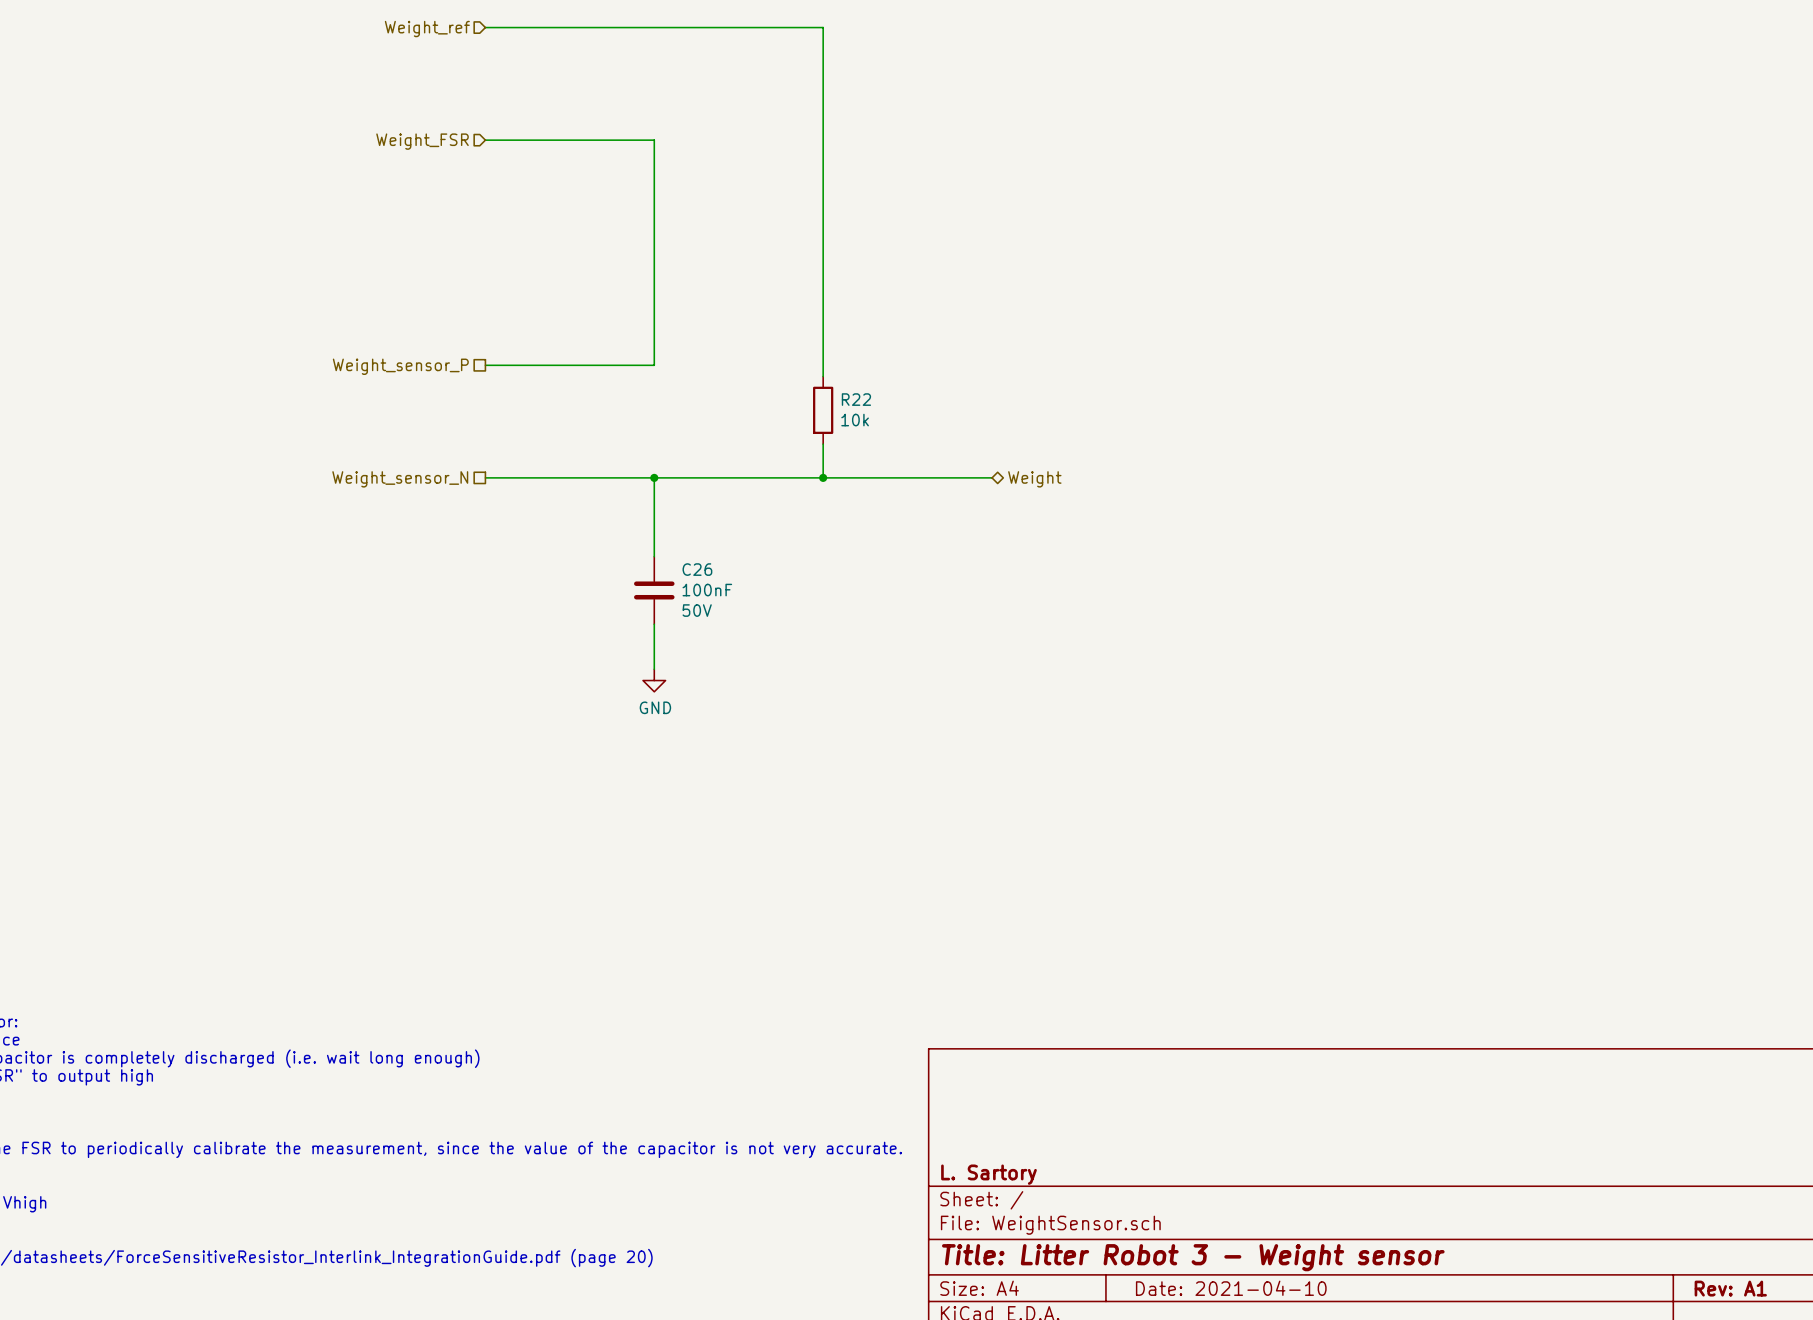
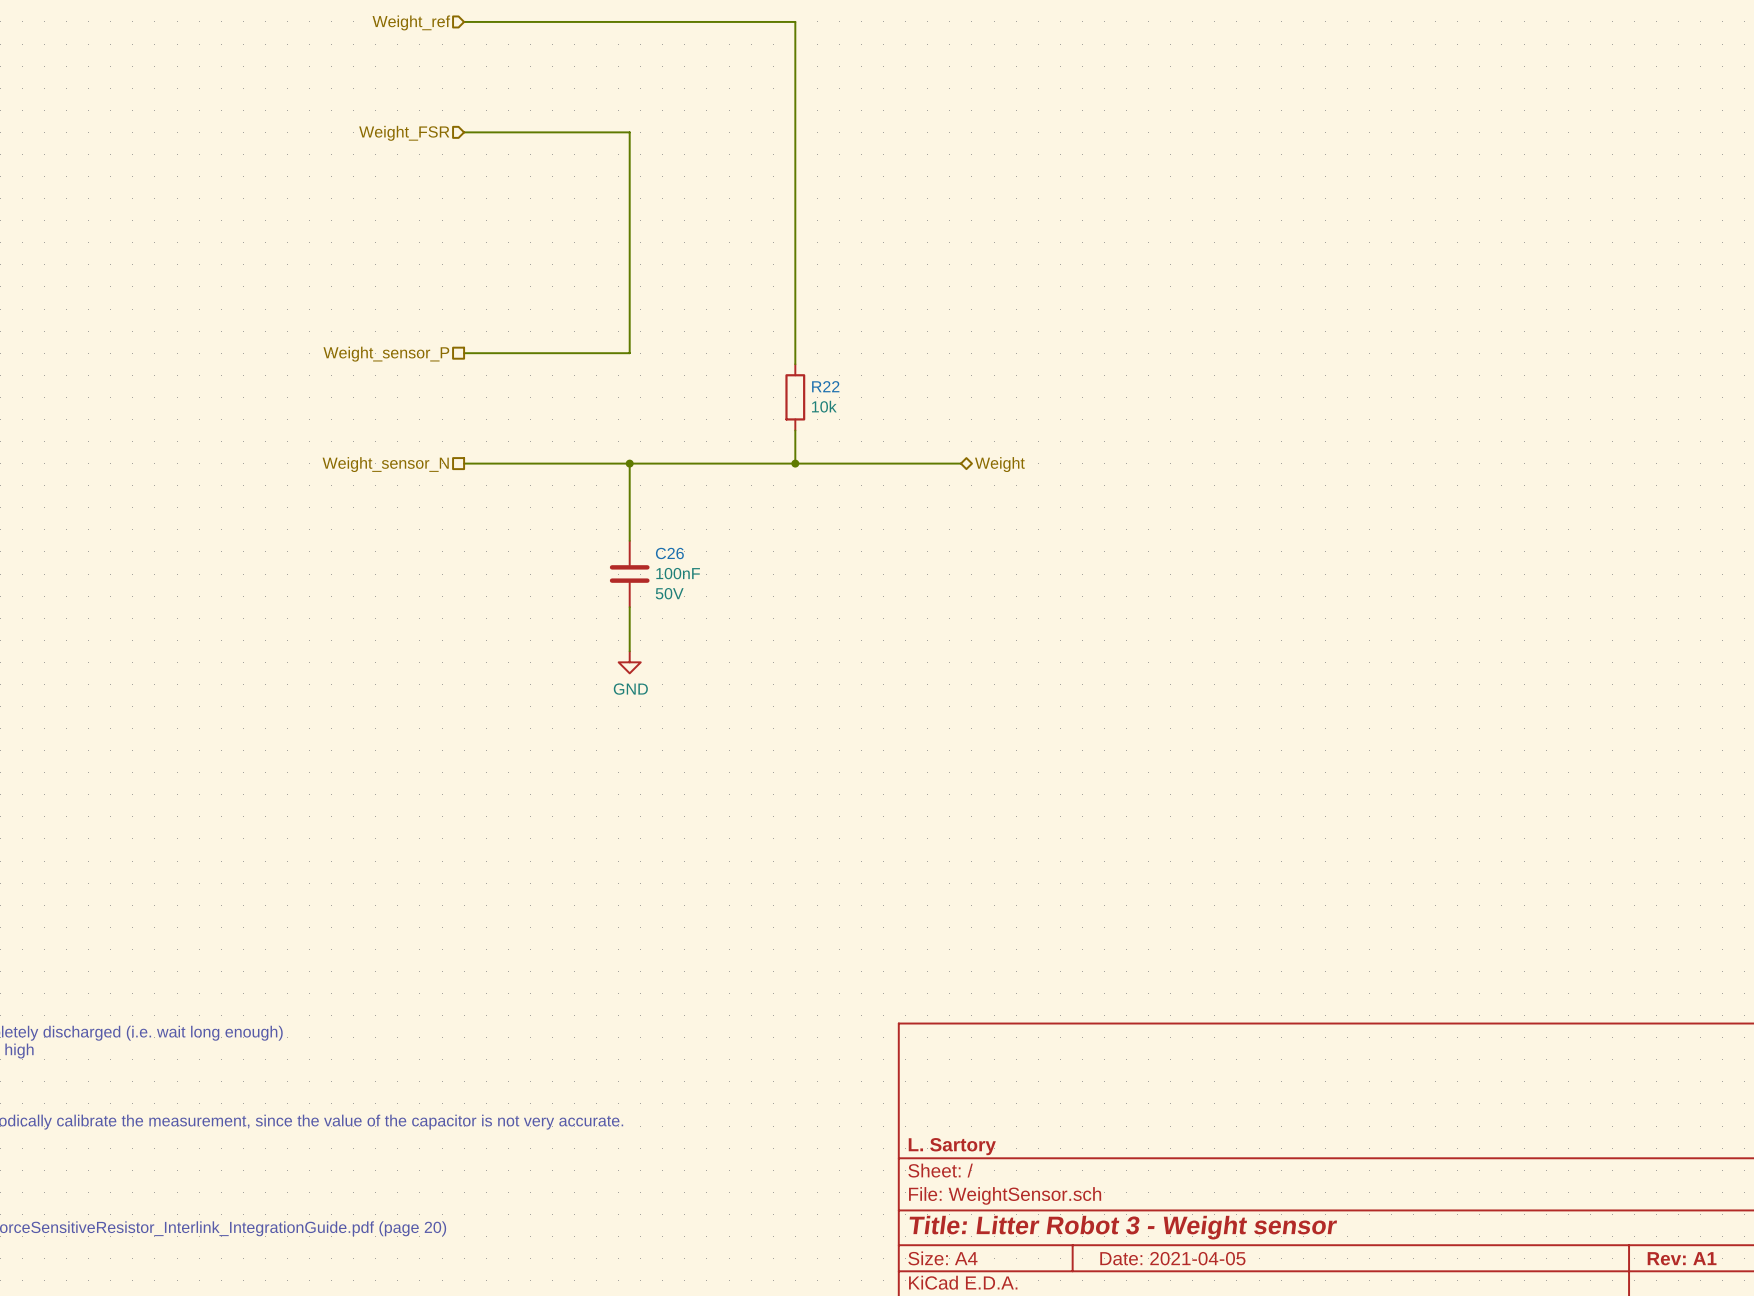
title block: Date: 2021-04-10 (1231, 1288) -> Date: 2021-04-05 (1172, 1258)

